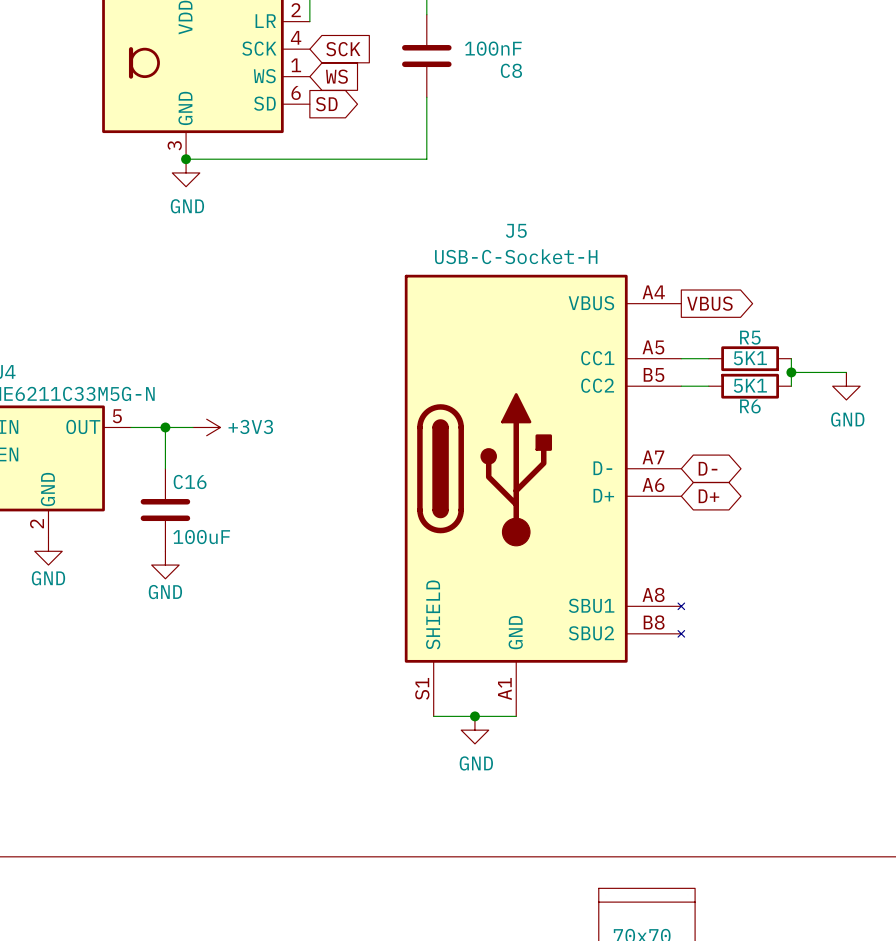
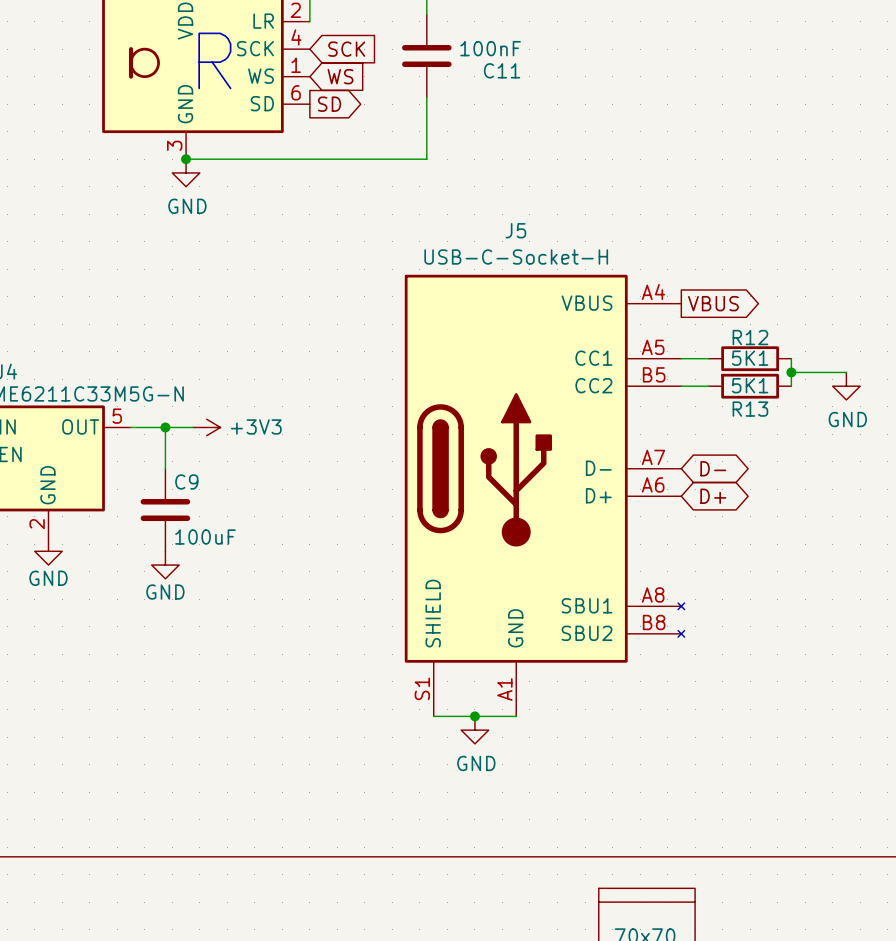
text: none -> R (214, 60)
C8 name: C8 (511, 70) -> C11 (502, 70)
R5 name: R5 (750, 337) -> R12 (750, 337)
R6 name: R6 (750, 406) -> R13 (750, 409)
C16 name: C16 (190, 481) -> C9 (186, 481)

